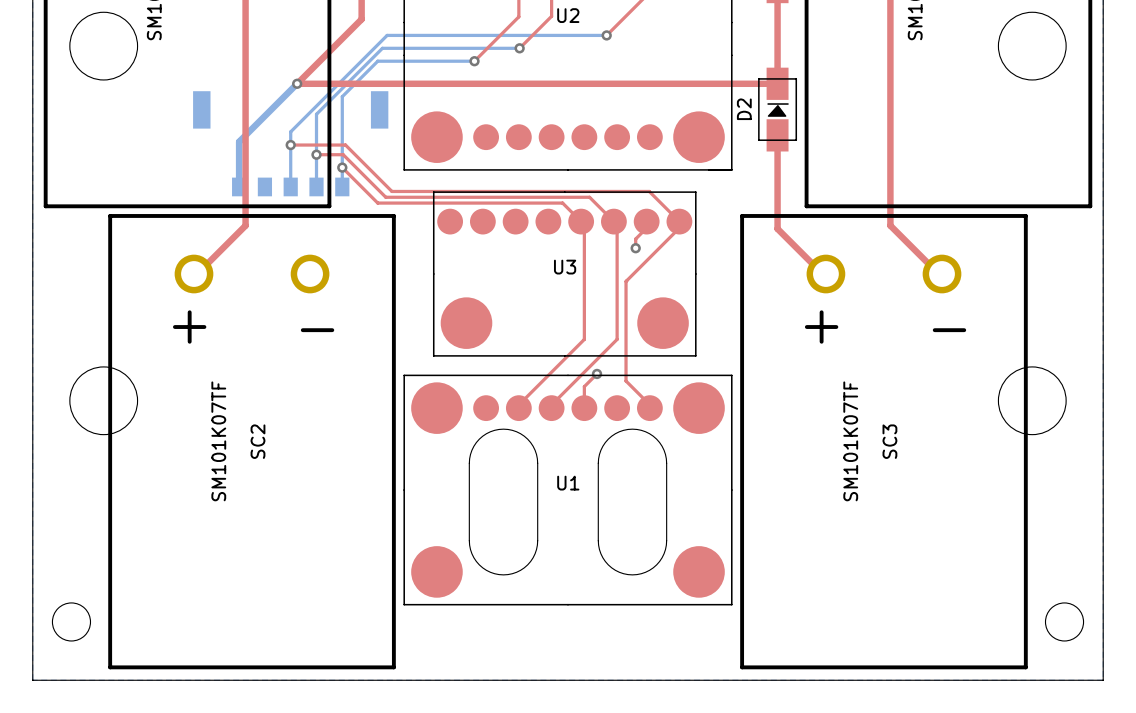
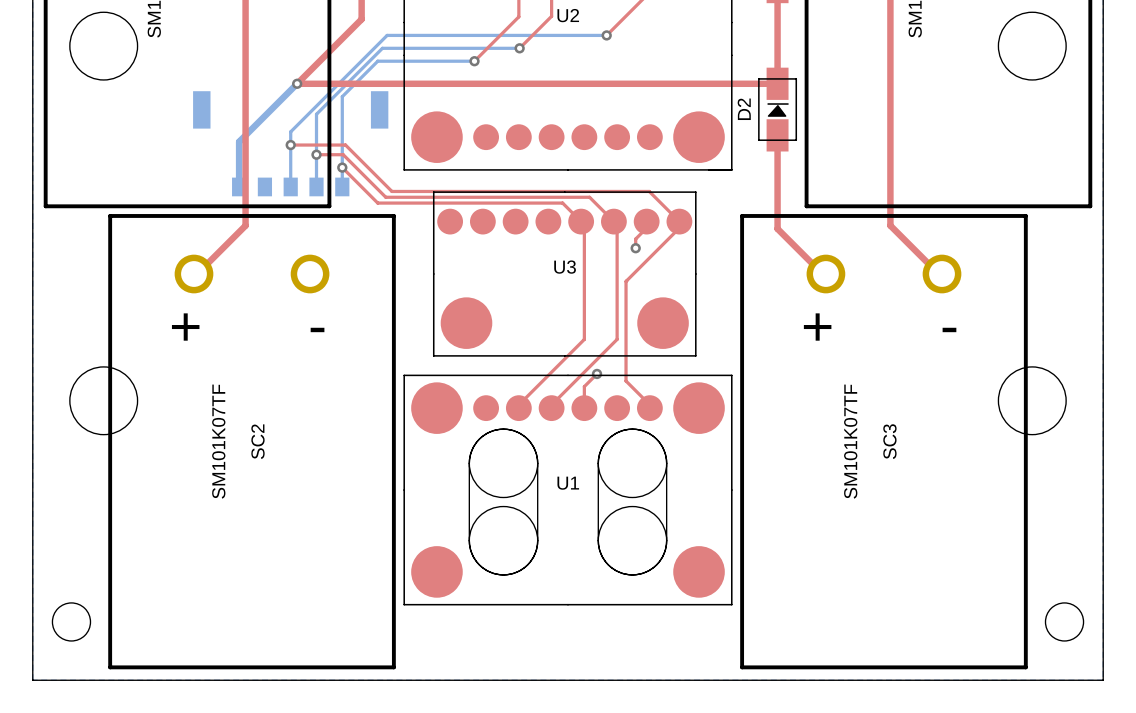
round board edge: none -> [469, 428, 539, 498]
round board edge: none -> [597, 428, 667, 498]
round board edge: none -> [469, 506, 539, 576]
round board edge: none -> [597, 506, 667, 576]

